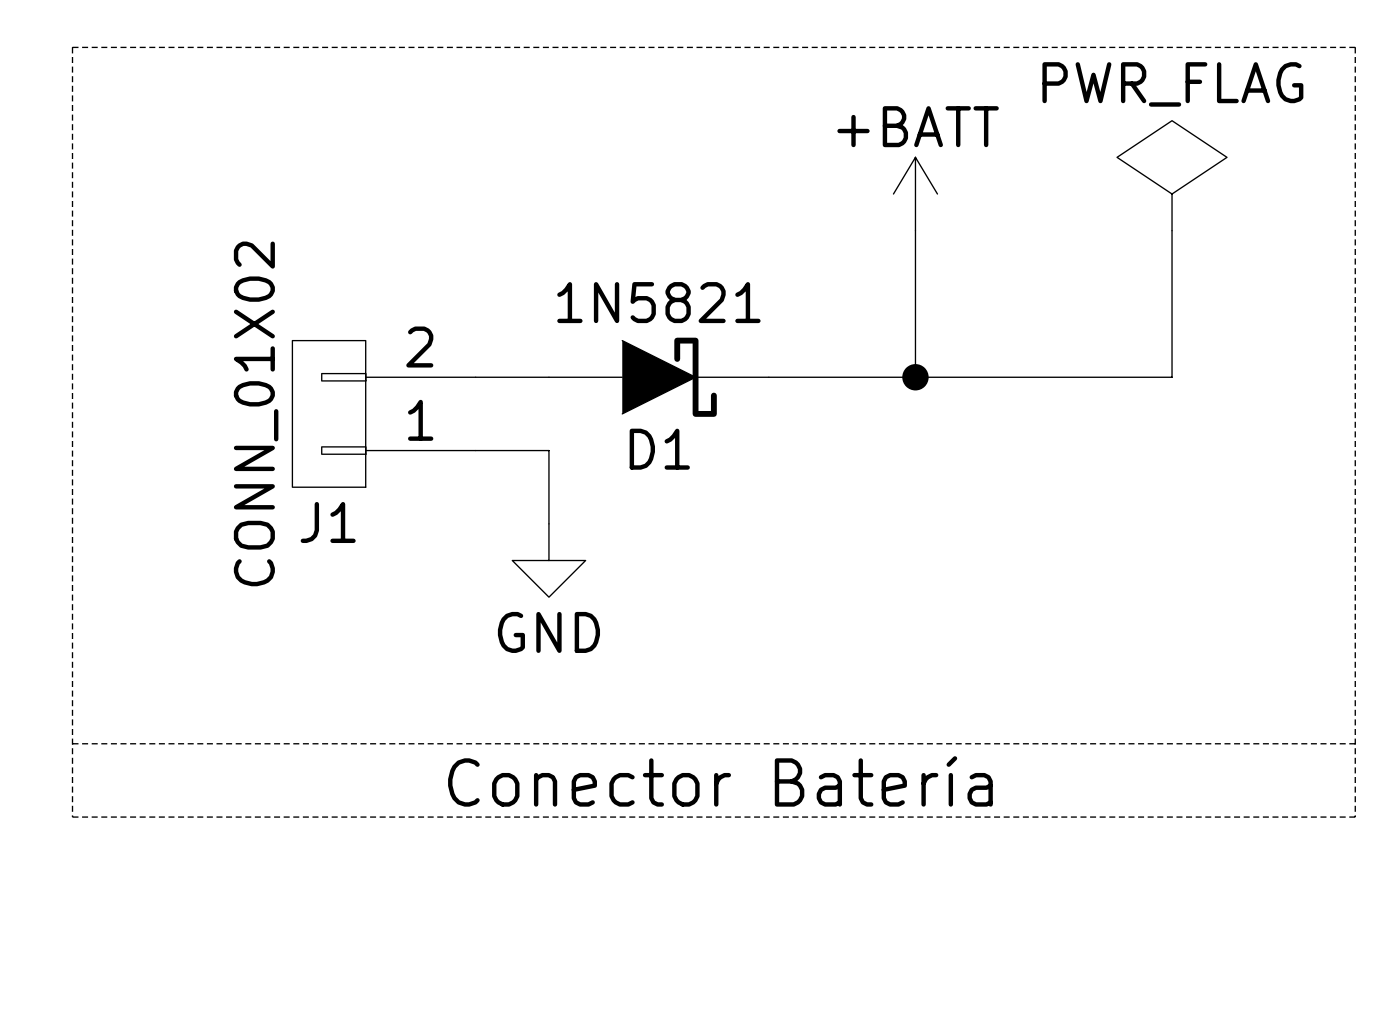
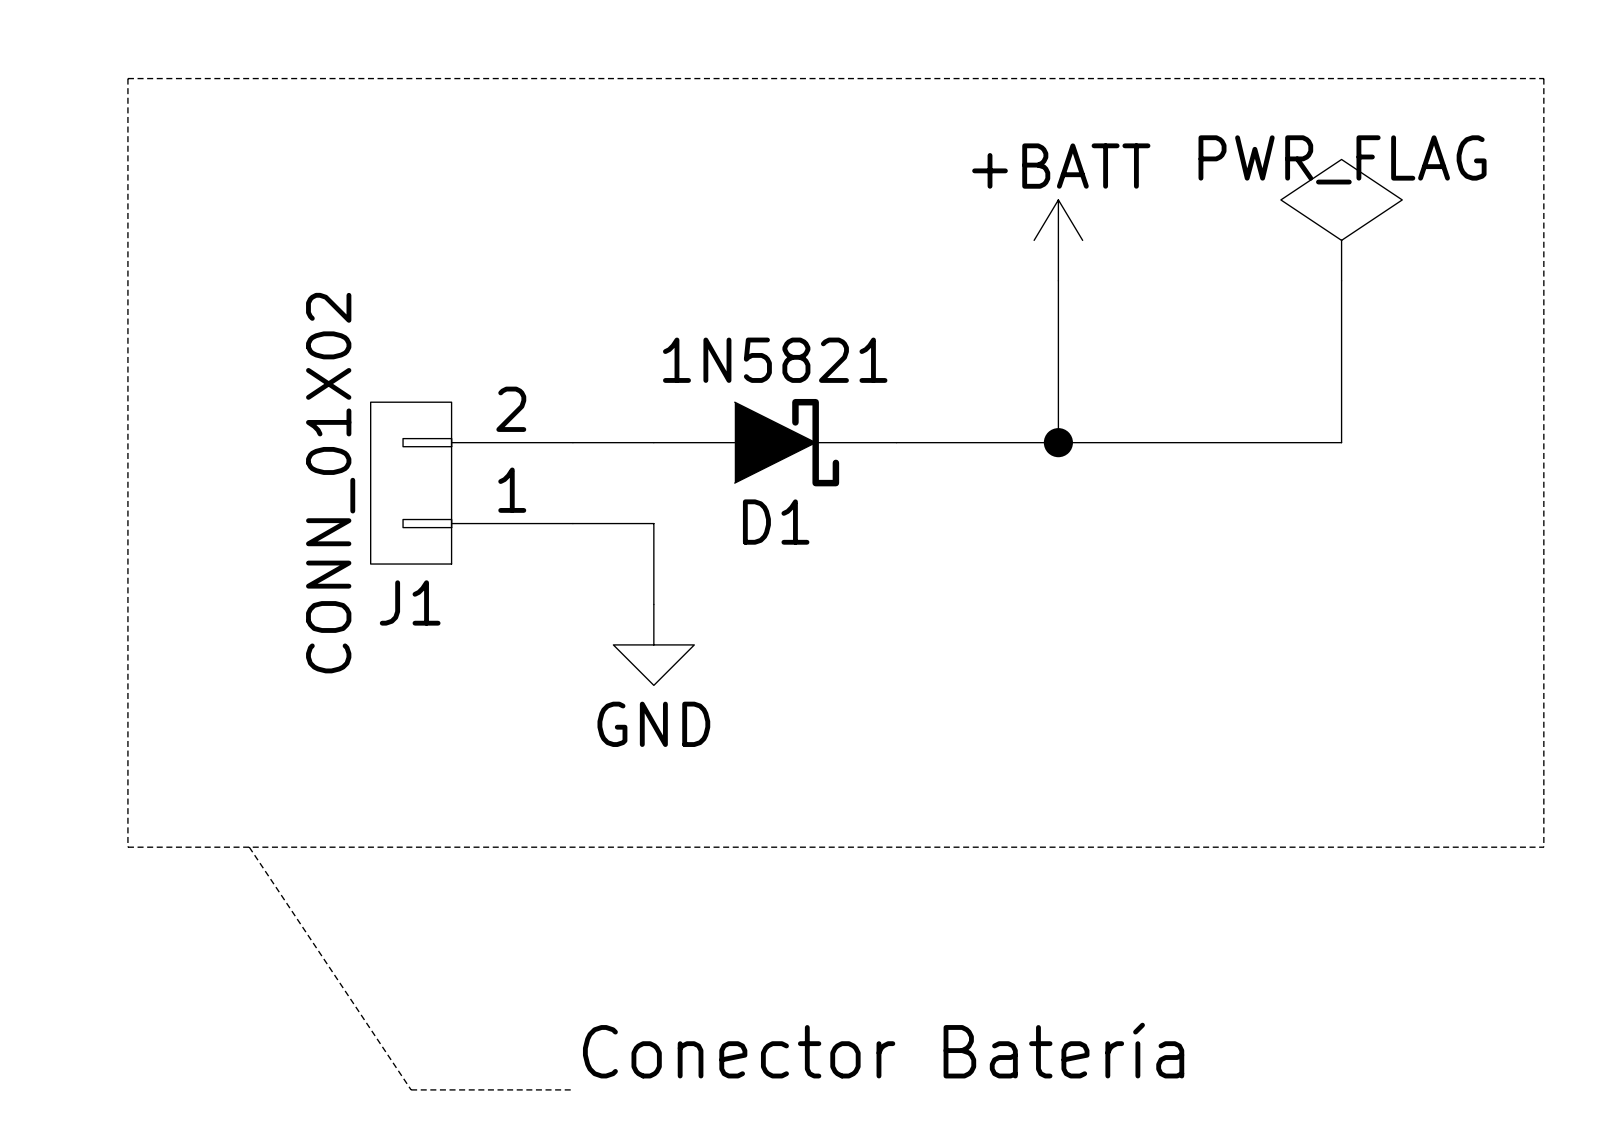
power symbol text position: PWR_FLAG (1172, 84) -> PWR_FLAG (1342, 159)
line: (72, 743) (72, 817) (1355, 817) (1355, 743) -> none
line: none -> (249, 847) (411, 1089) (572, 1089)
text position: Conector Batería (720, 781) -> Conector Batería (883, 1050)

